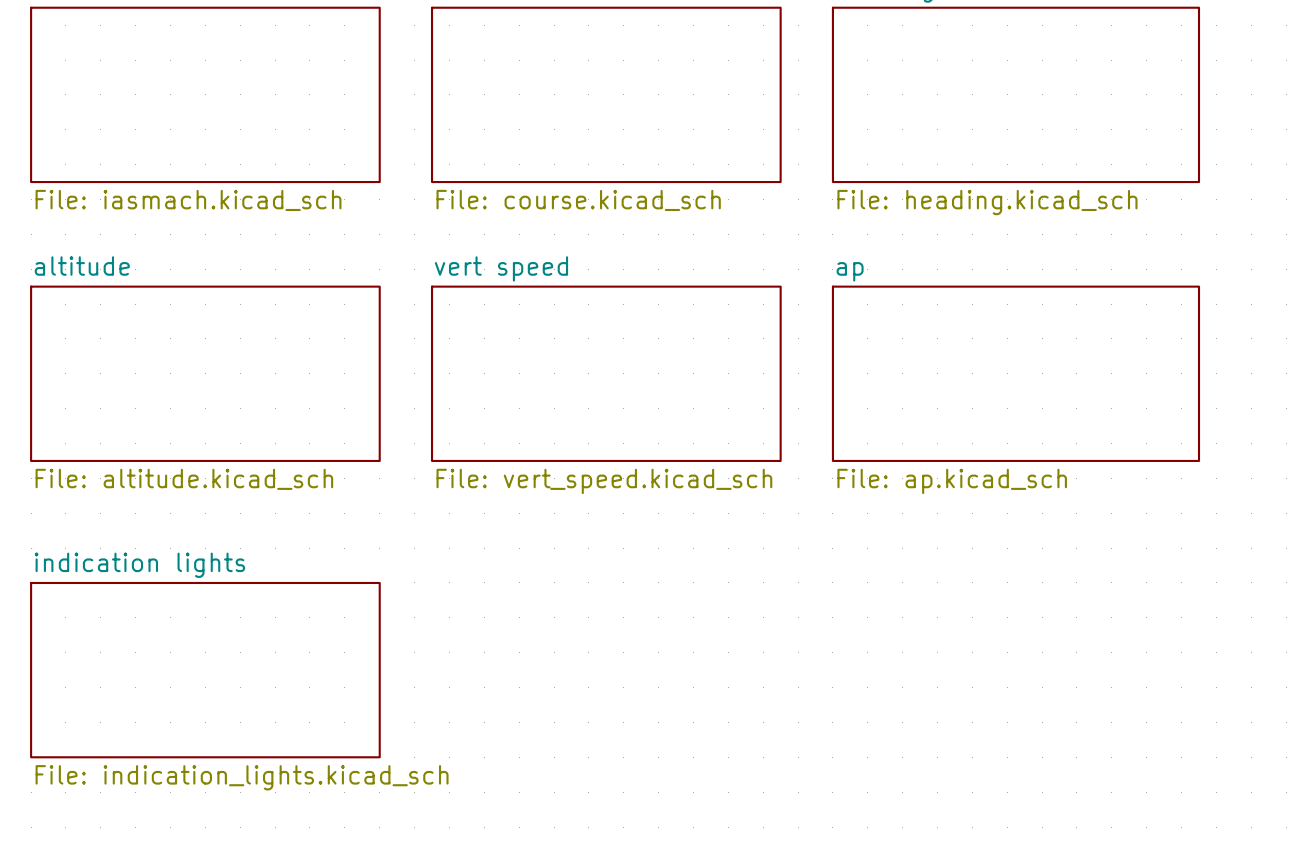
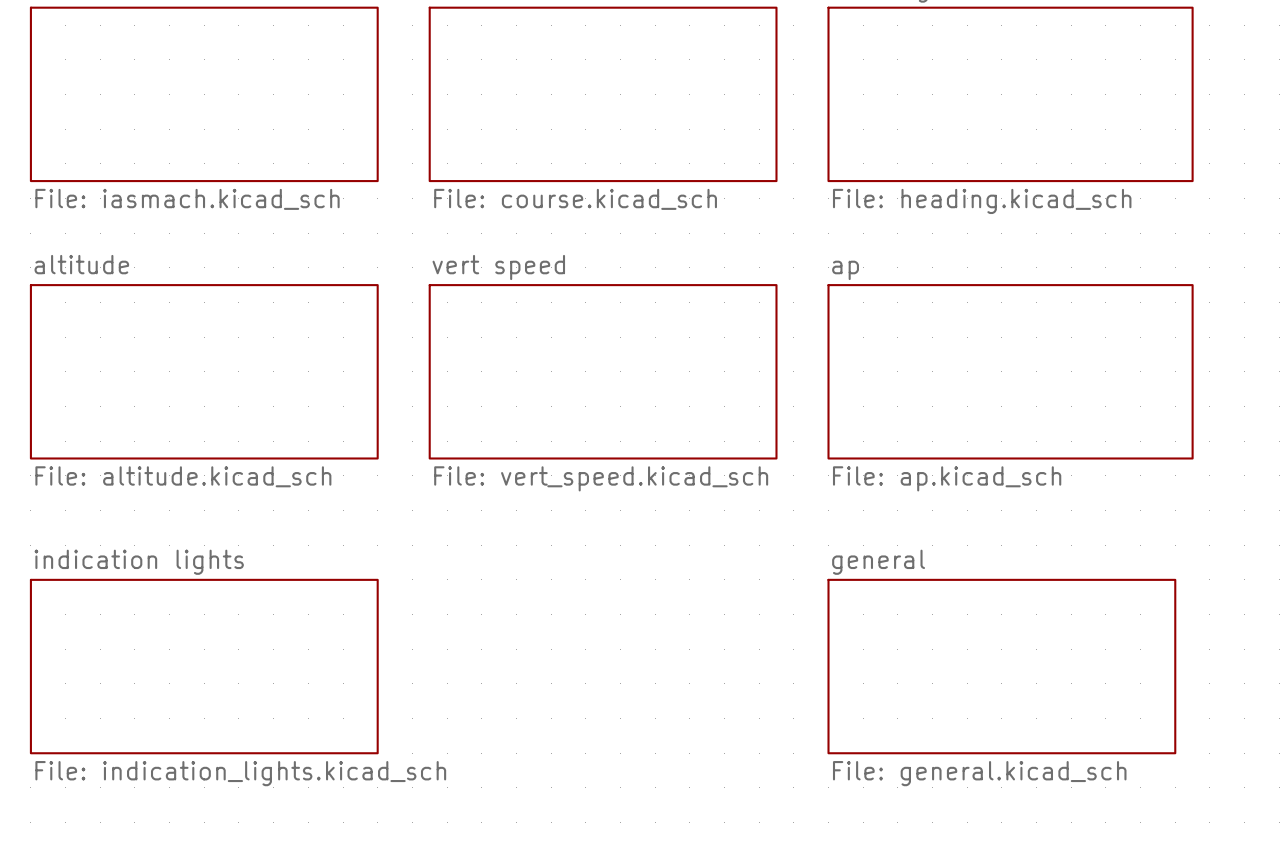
sheet general: none -> File: general.kicad_sch (1001, 666)

